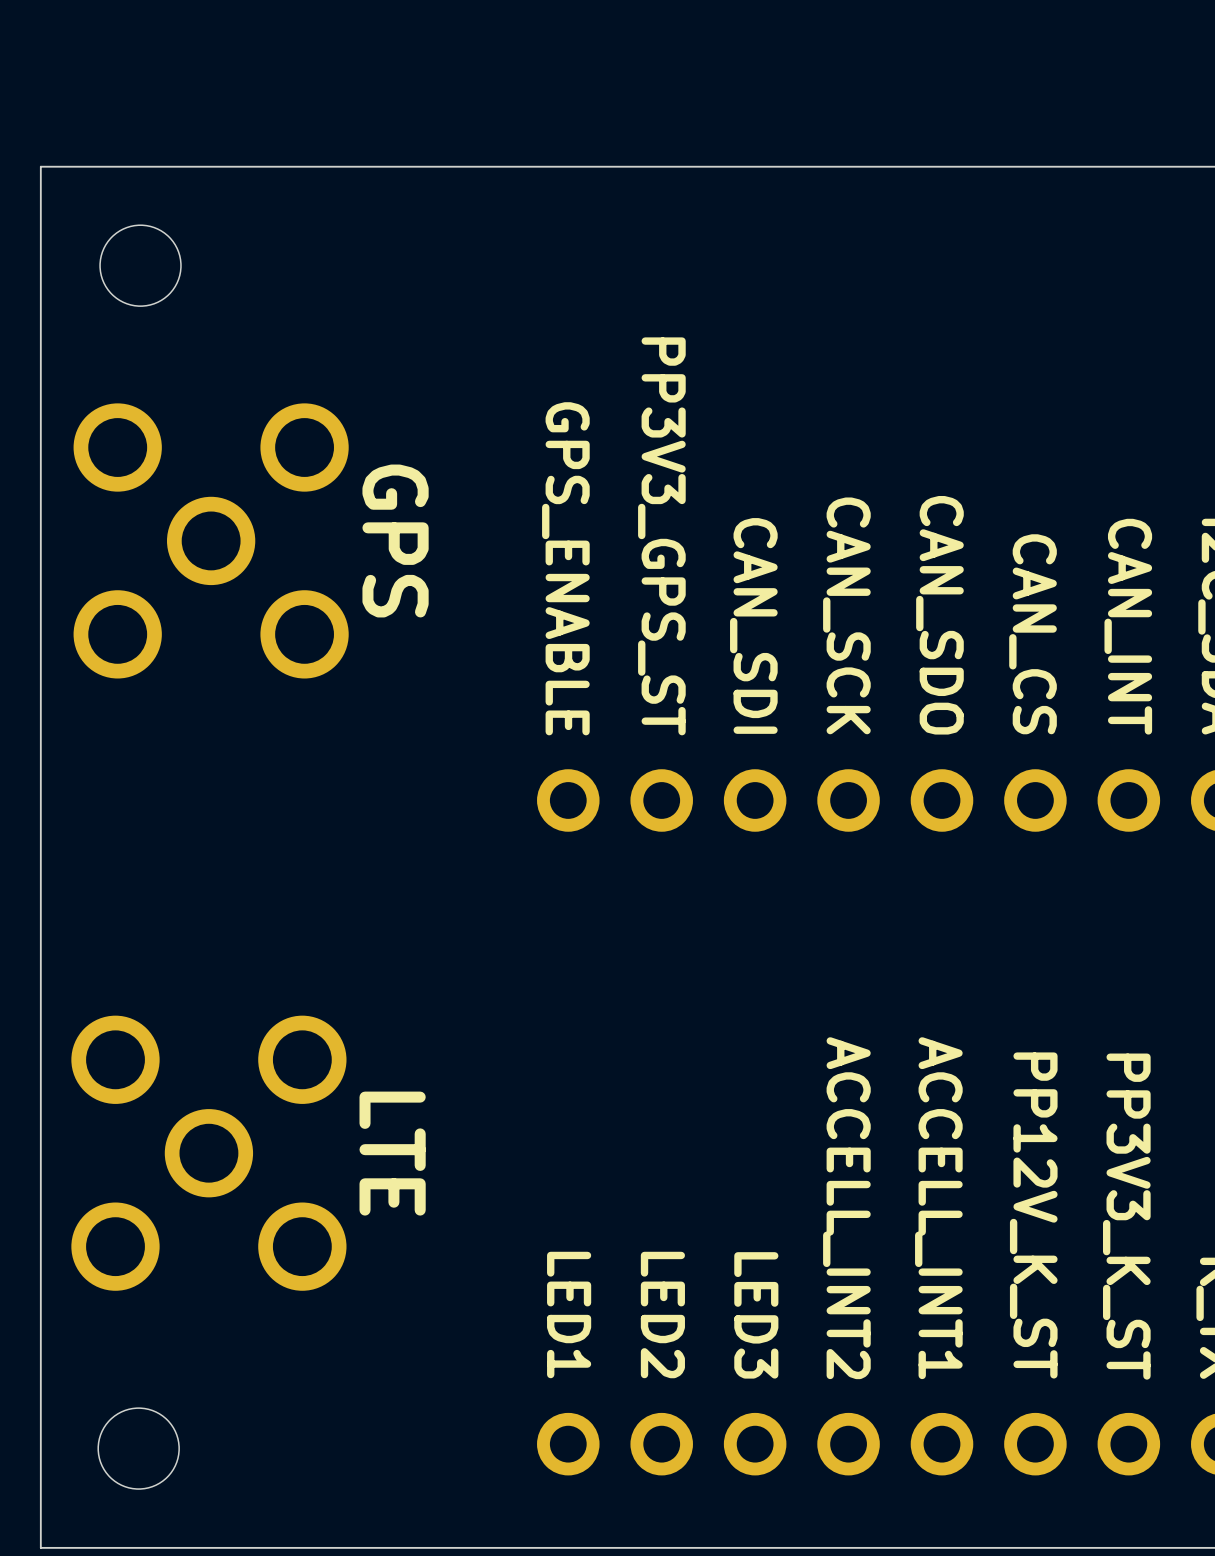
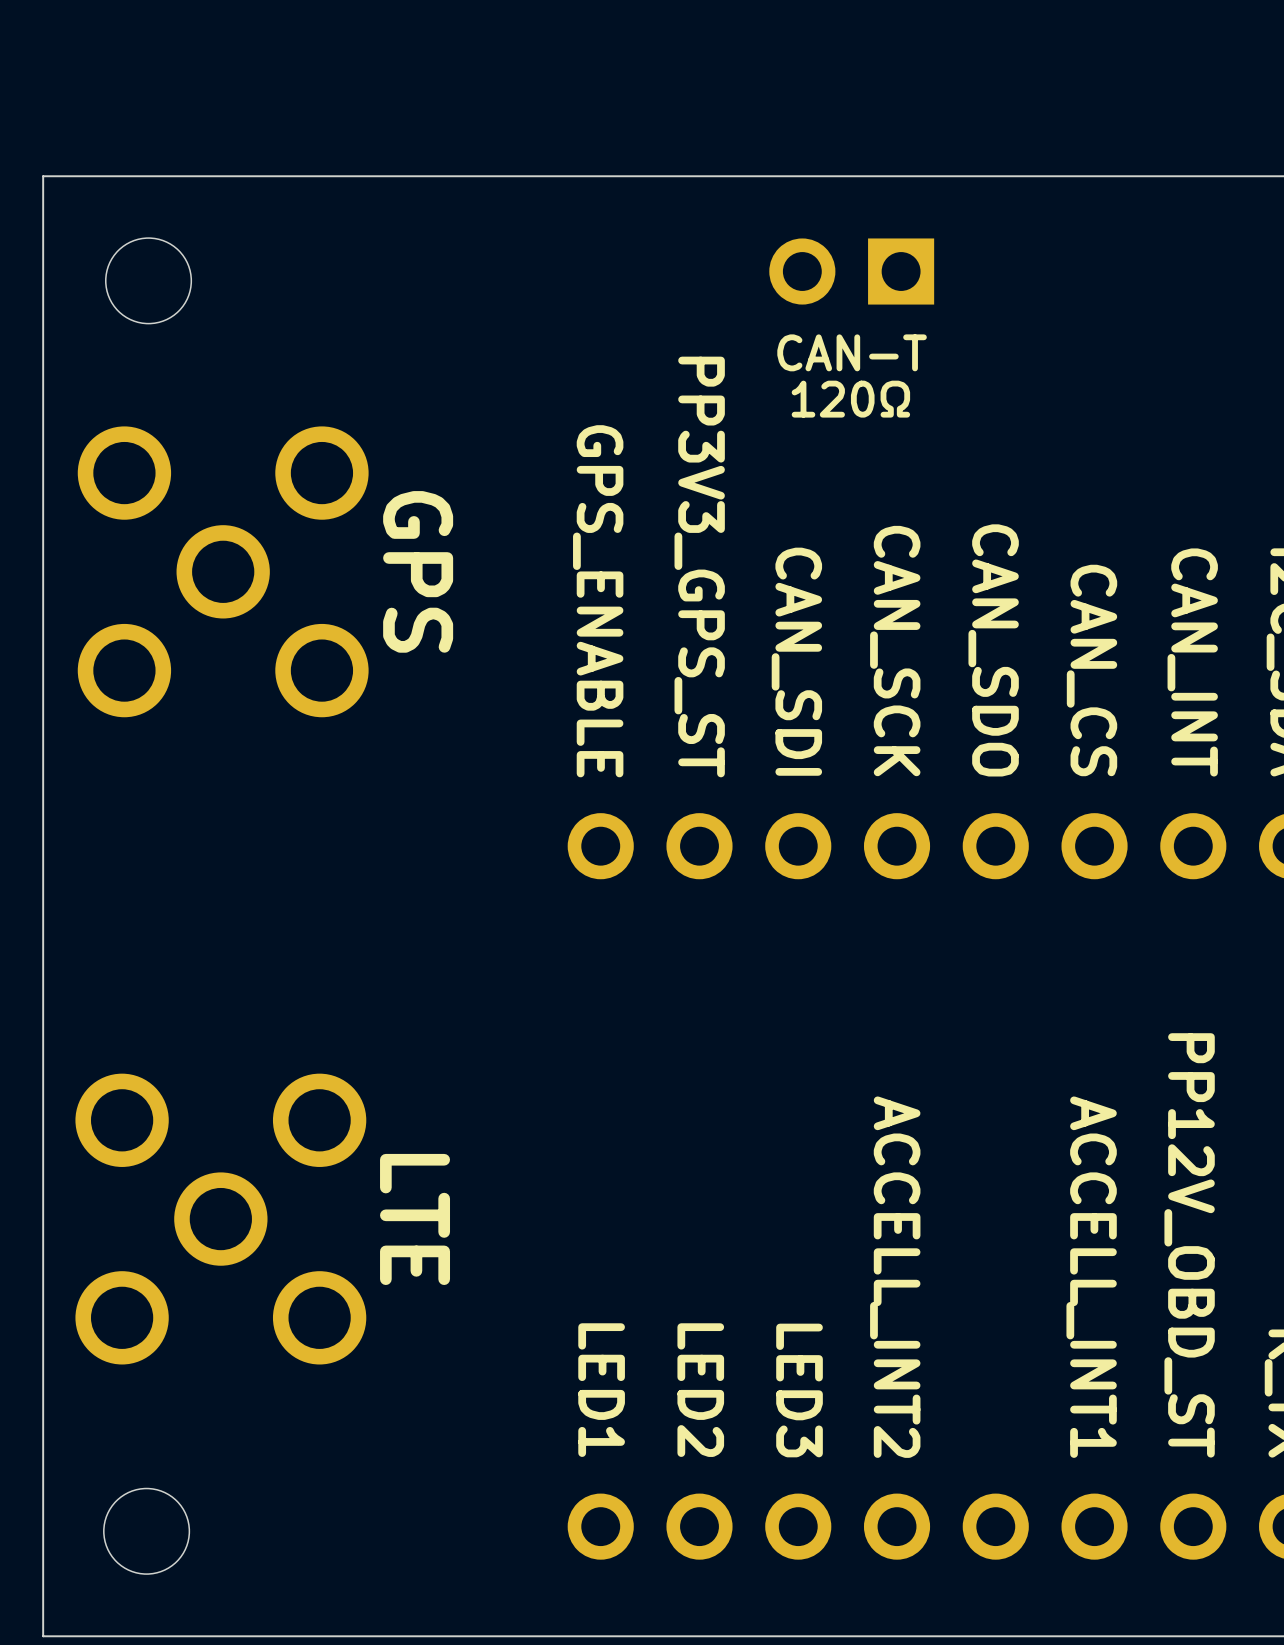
part: none -> (851, 271)
text: none -> CAN-T (852, 352)
text: none -> 120Ω (850, 399)
text: ACCELL_INT1 (938, 1208) -> none
text: PP12V_K_ST (1033, 1215) -> ACCELL_INT1 (1091, 1277)
text: PP3V3_K_ST (1126, 1216) -> PP12V_OBD_ST (1189, 1245)

